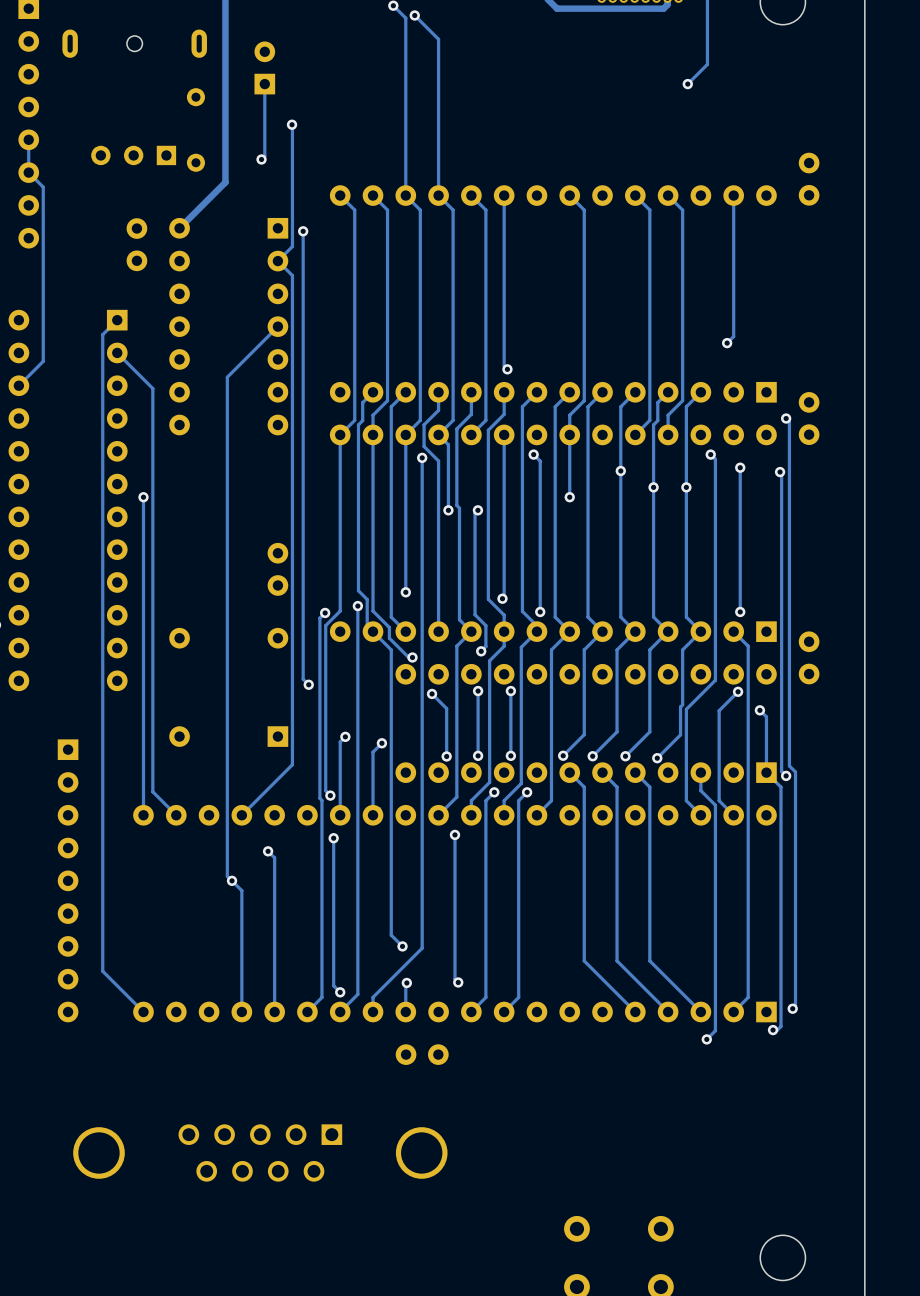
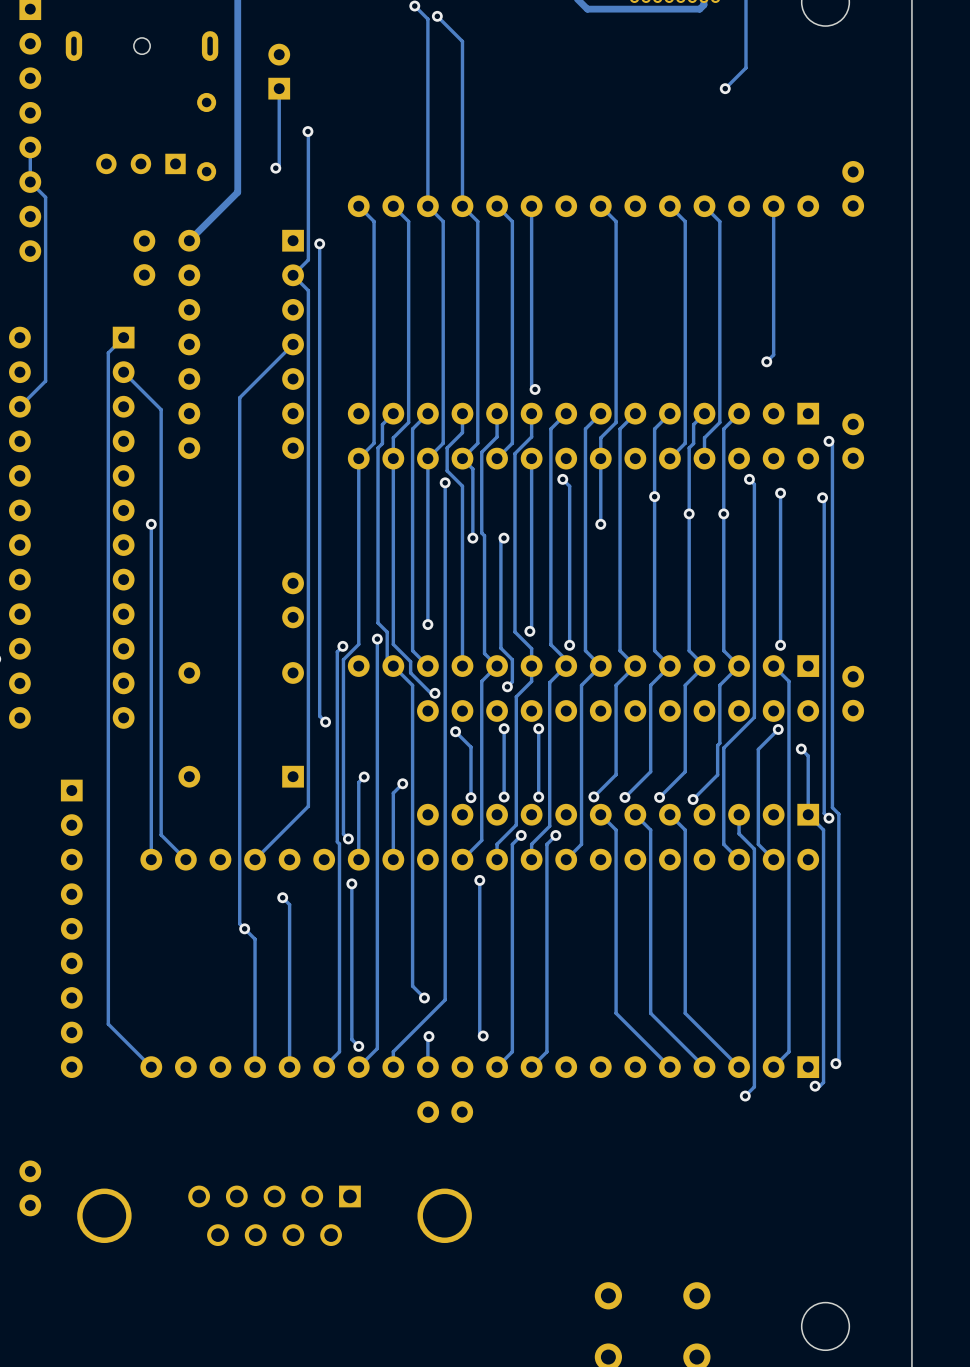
part: none -> (30, 1188)

